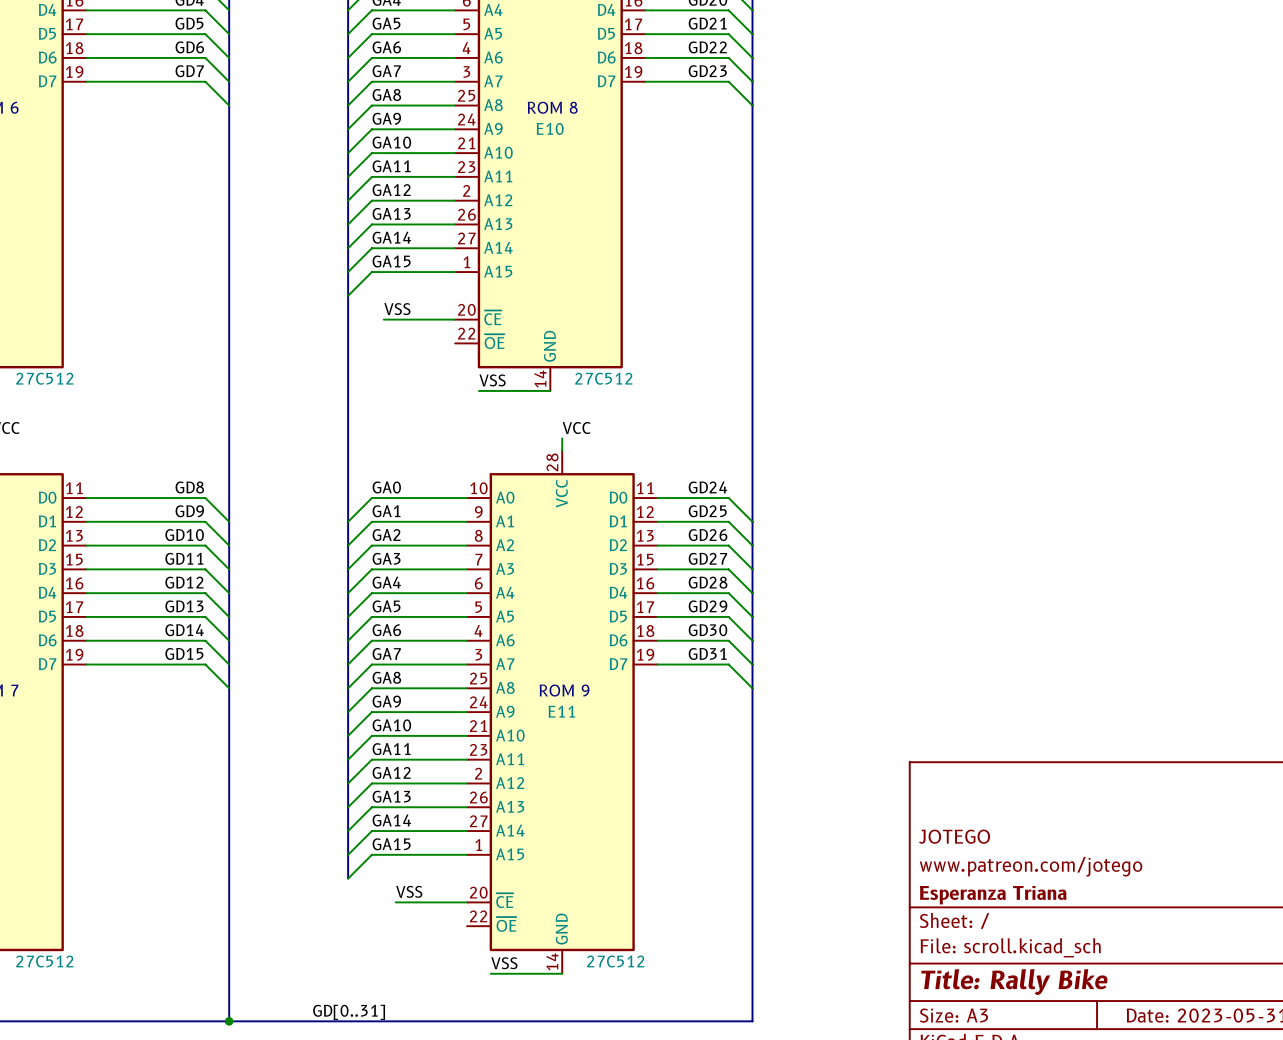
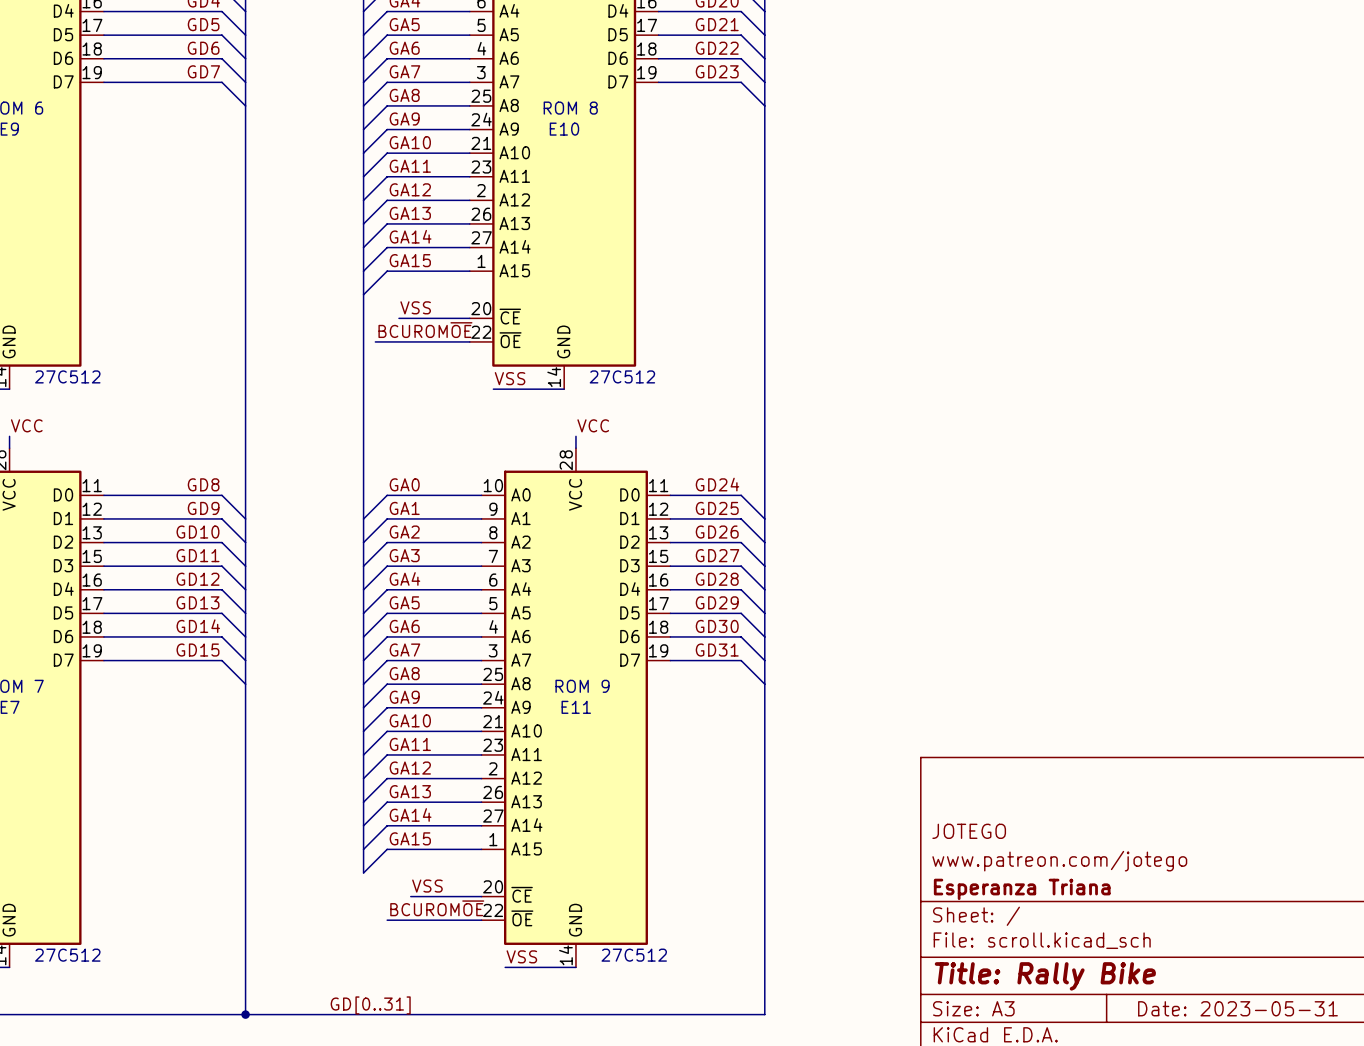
label: none -> BCUROM~{OE} (425, 330)
wire: none -> (375, 341) (469, 341)
label: none -> BCUROM~{OE} (437, 908)
wire: none -> (387, 920) (481, 920)

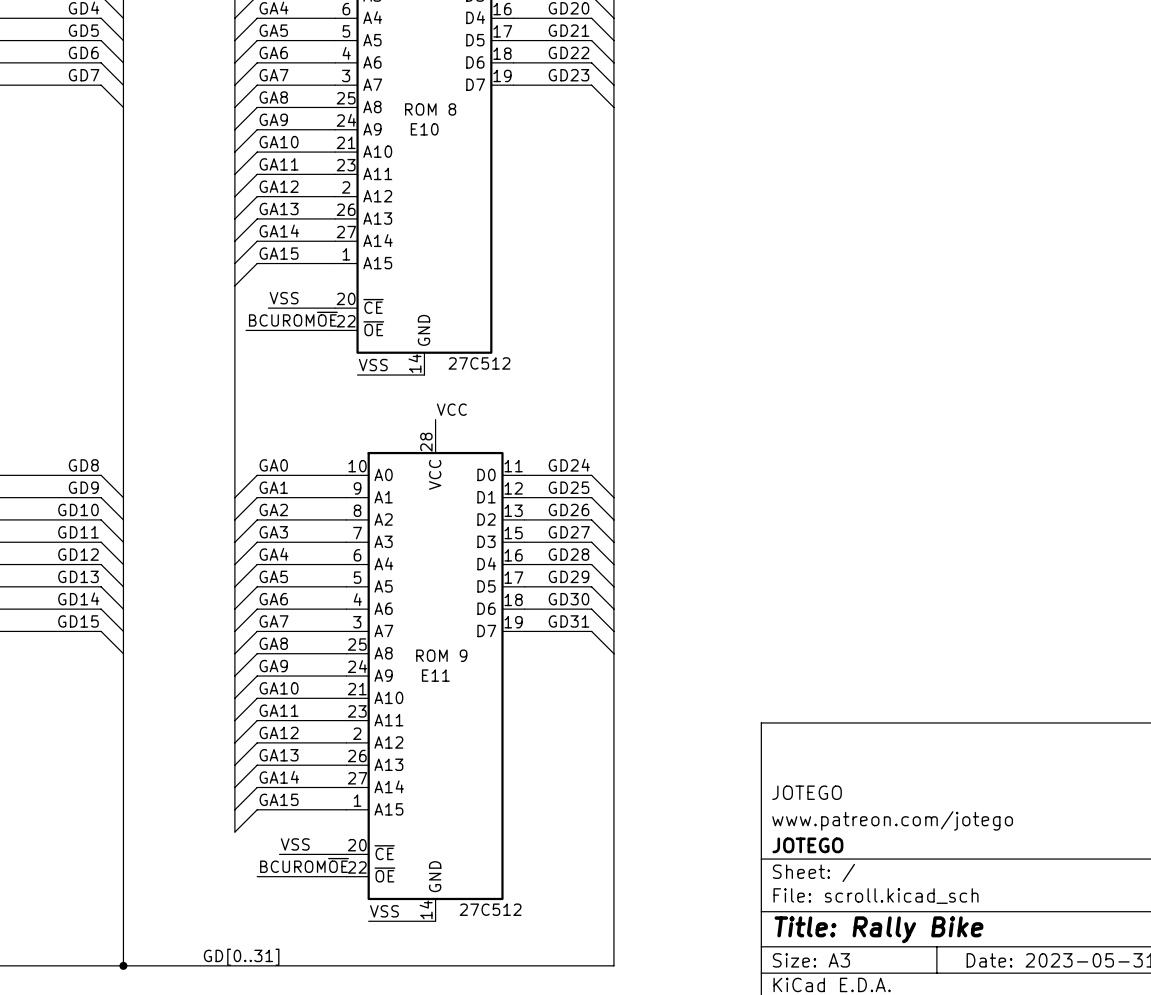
title block: Esperanza Triana (1022, 889) -> JOTEGO (807, 845)

